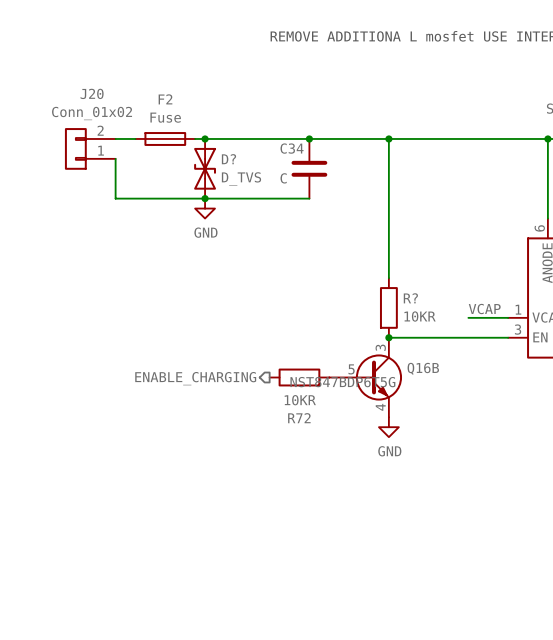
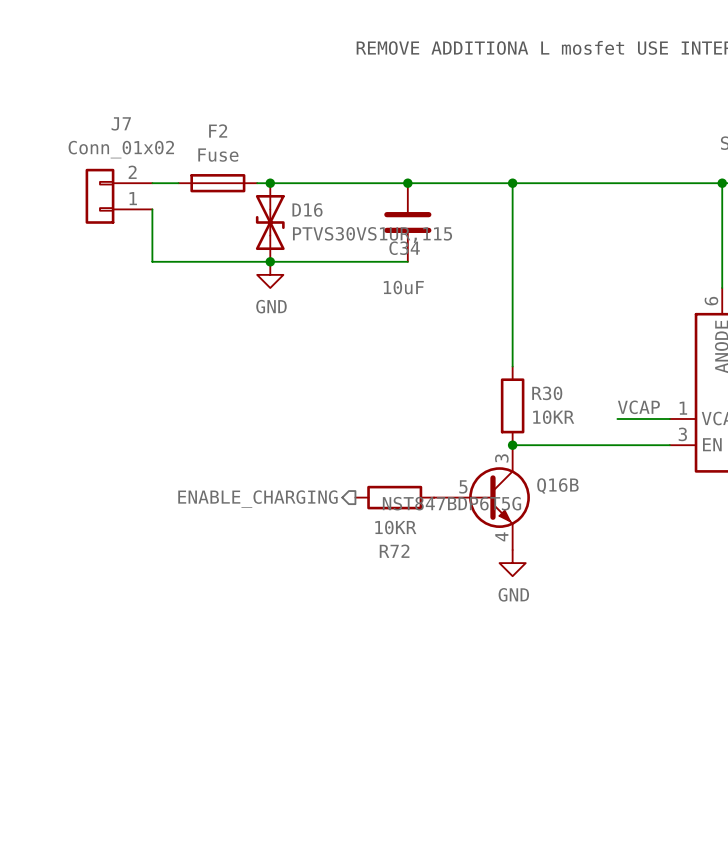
J20 name: J20 (92, 93) -> J7 (121, 123)
C34 name position: C34 (292, 148) -> C34 (404, 248)
D? name: D? (228, 159) -> D16 (307, 209)
D? value: D_TVS (241, 178) -> PTVS30VS1UR,115 (372, 234)
C34 value: C (283, 178) -> 10uF (403, 287)
R? name: R? (410, 298) -> R30 (547, 393)

